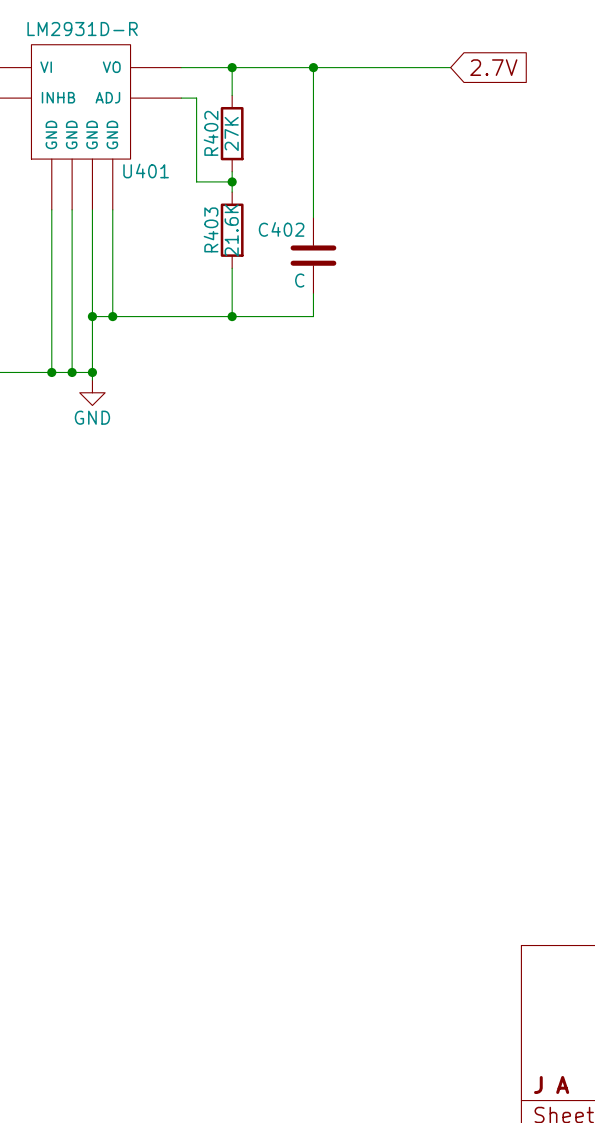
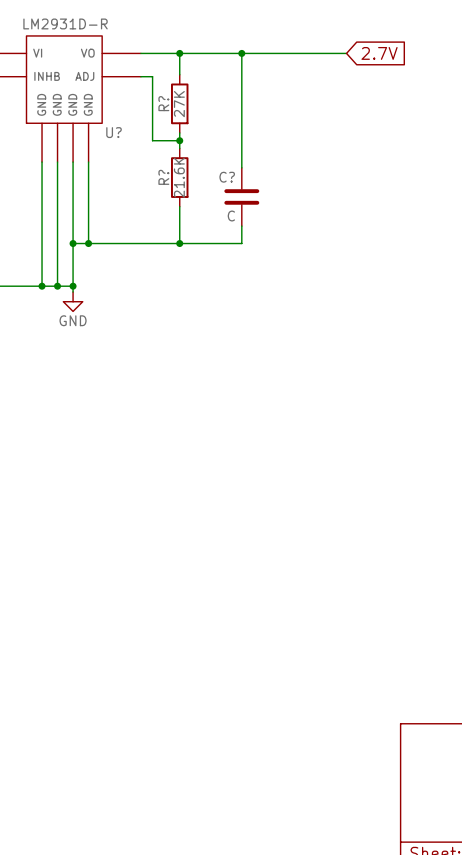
R402 name: R402 (211, 133) -> R? (163, 103)
U401 name: U401 (146, 170) -> U? (114, 132)
R403 name: R403 (211, 229) -> R? (163, 177)
C402 name: C402 (281, 229) -> C? (227, 177)
title block: J A (551, 1084) -> none

